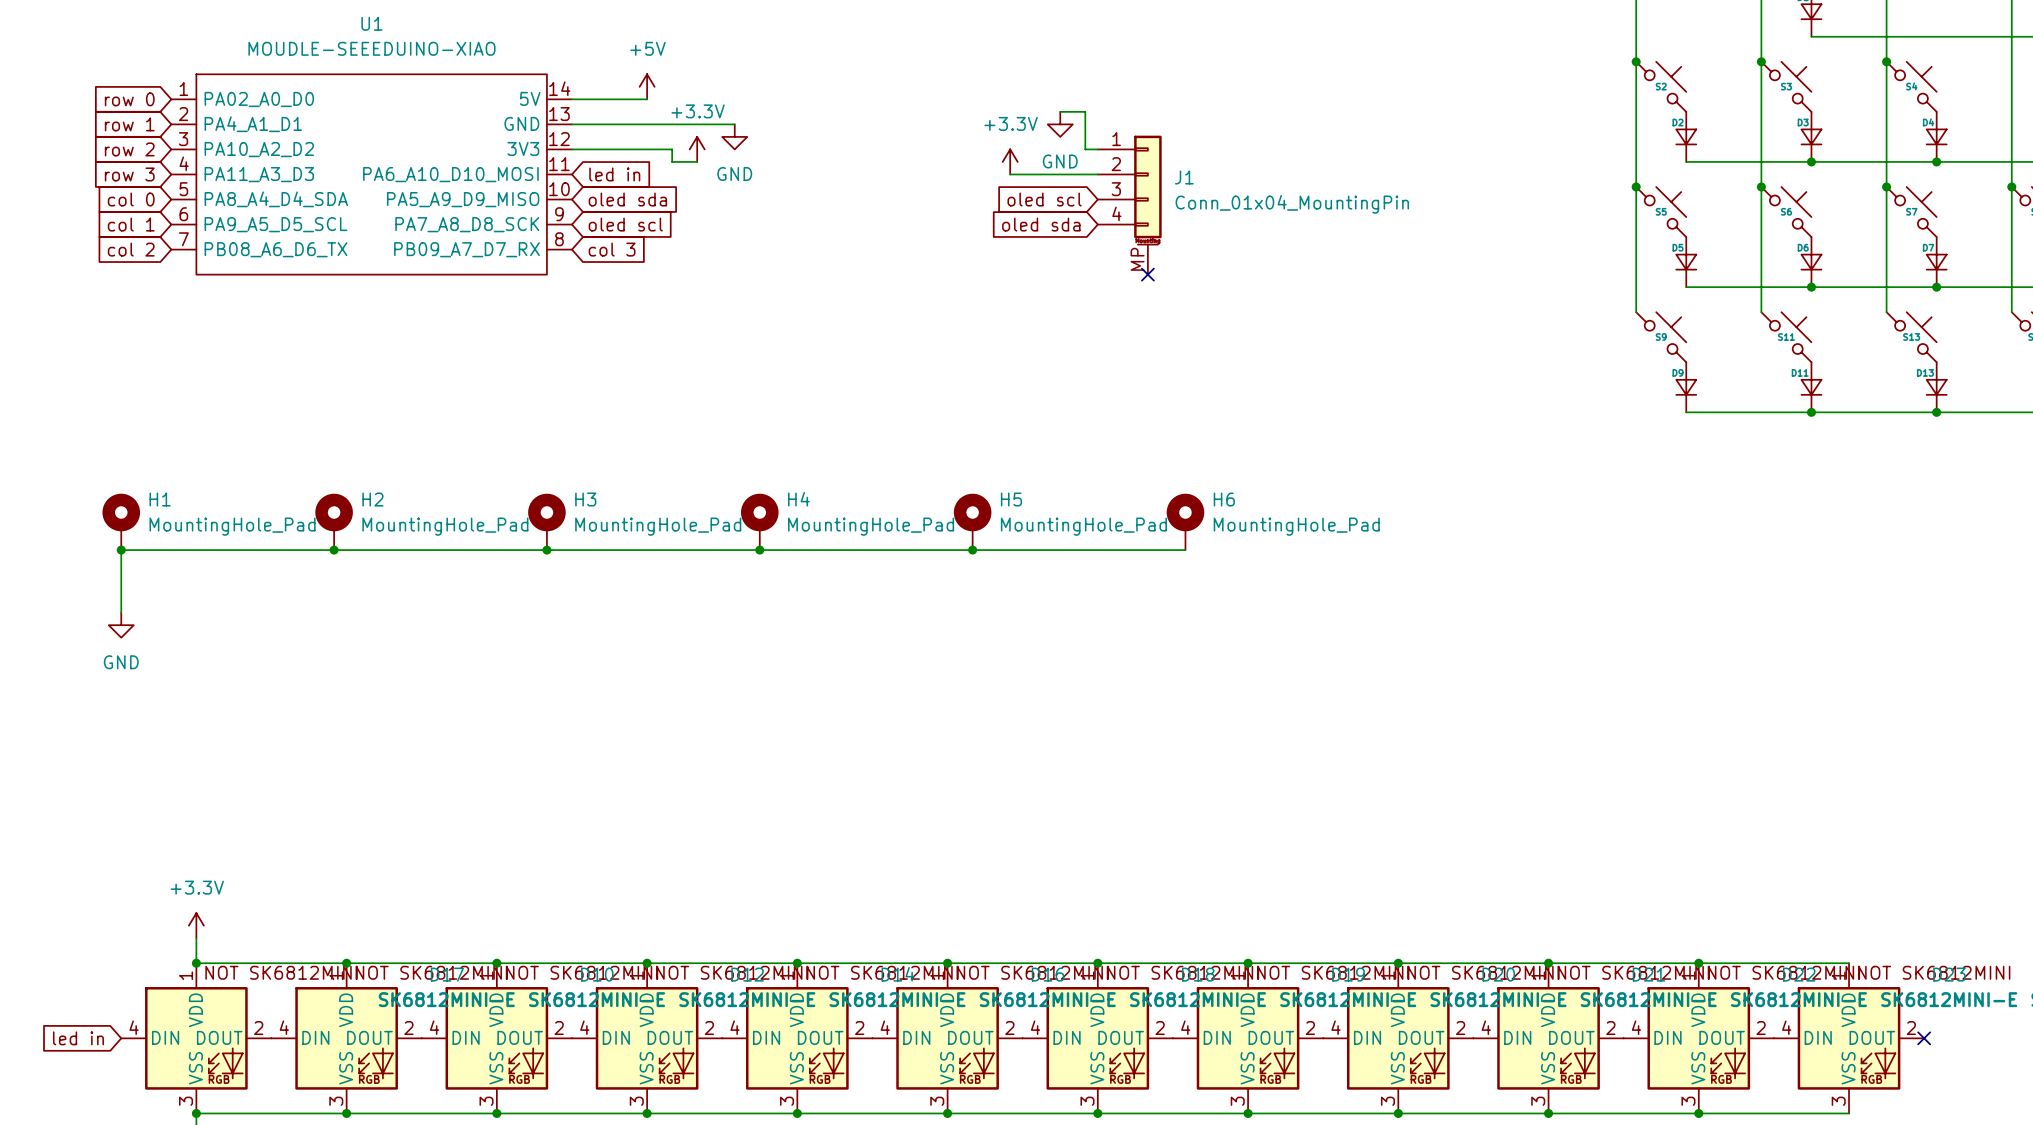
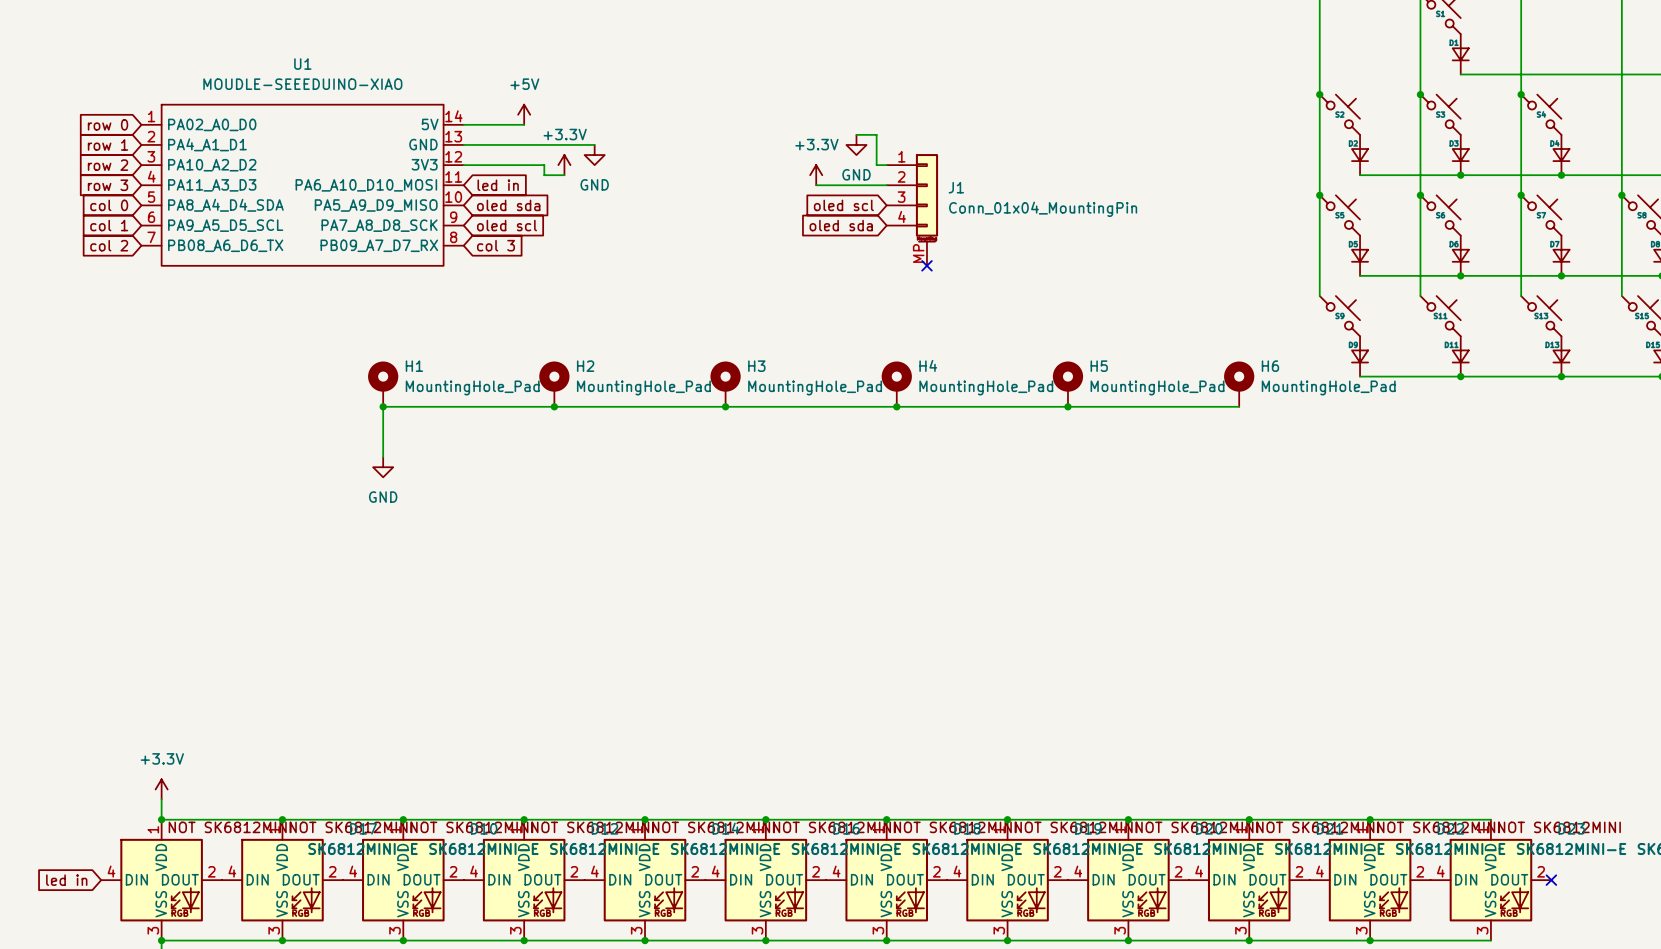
junction: none -> (383, 406)
junction: none -> (554, 406)
junction: none -> (725, 406)
junction: none -> (896, 406)
junction: none -> (1067, 406)
wire: none -> (1239, 406) (383, 406) (383, 457)
H1 position: (121, 521) -> (383, 384)
H2 position: (334, 521) -> (554, 384)
H3 position: (546, 521) -> (725, 384)
H4 position: (759, 521) -> (896, 384)
H5 position: (972, 521) -> (1067, 384)
H6 position: (1185, 521) -> (1239, 384)
power symbol: none -> GND (383, 467)
junction: (121, 550) -> none
junction: (334, 550) -> none
junction: (546, 550) -> none
junction: (759, 550) -> none
junction: (972, 550) -> none
wire: (1185, 550) (121, 550) (121, 612) -> none
power symbol: GND (121, 625) -> none

